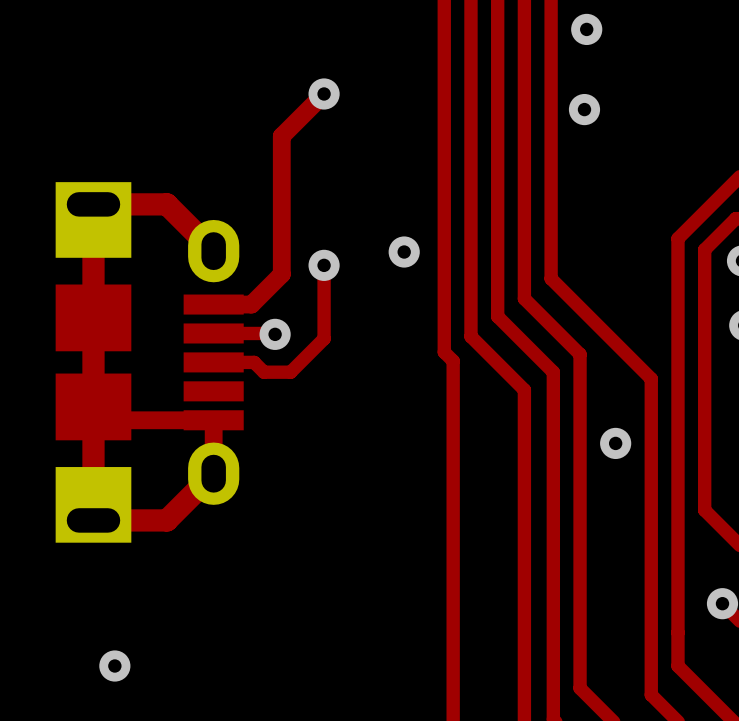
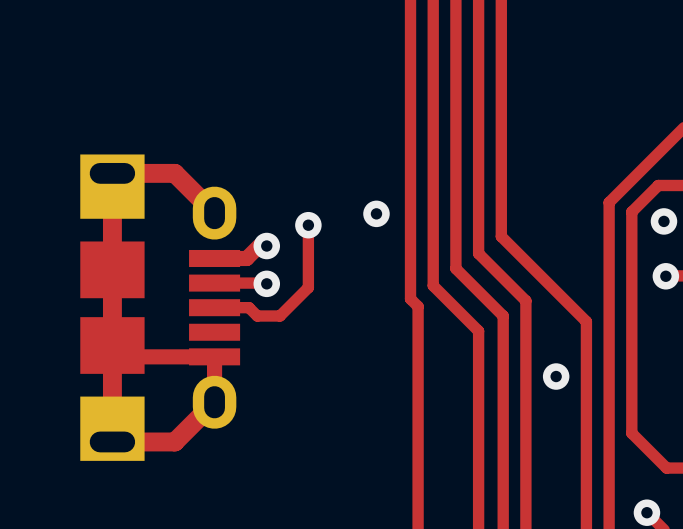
via: (586, 29) -> none
track: (324, 93) (281, 136) (281, 274) (266, 289) -> none
via: (324, 93) -> none
via: (584, 109) -> none
via: none -> (266, 246)

